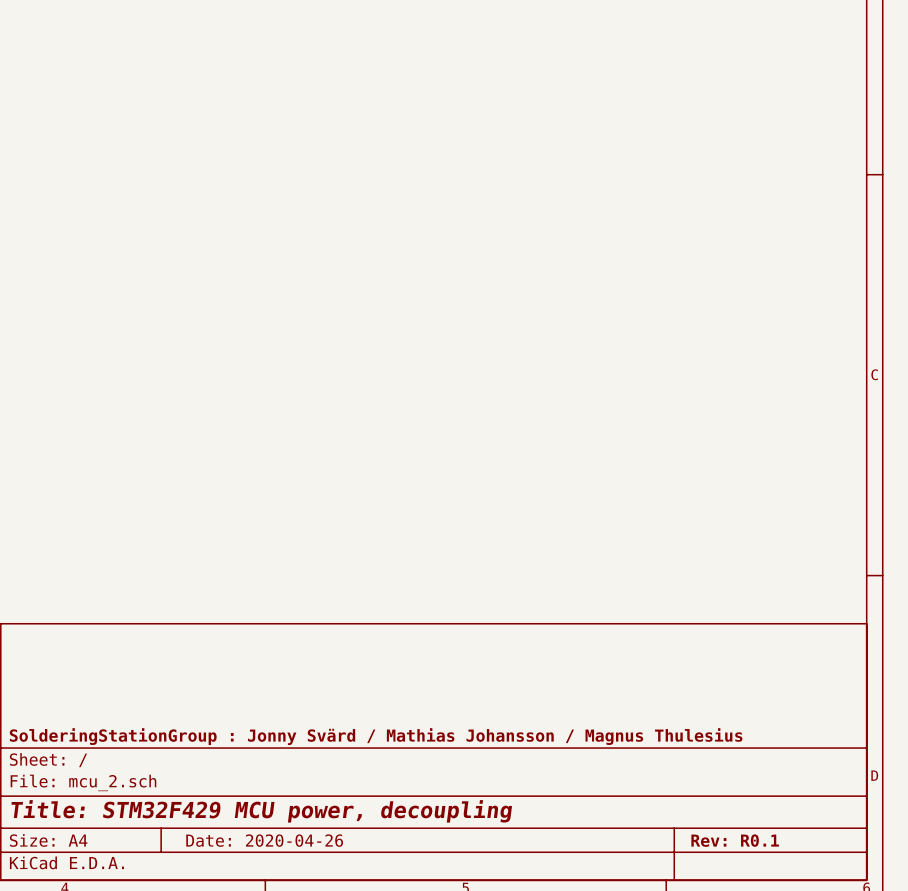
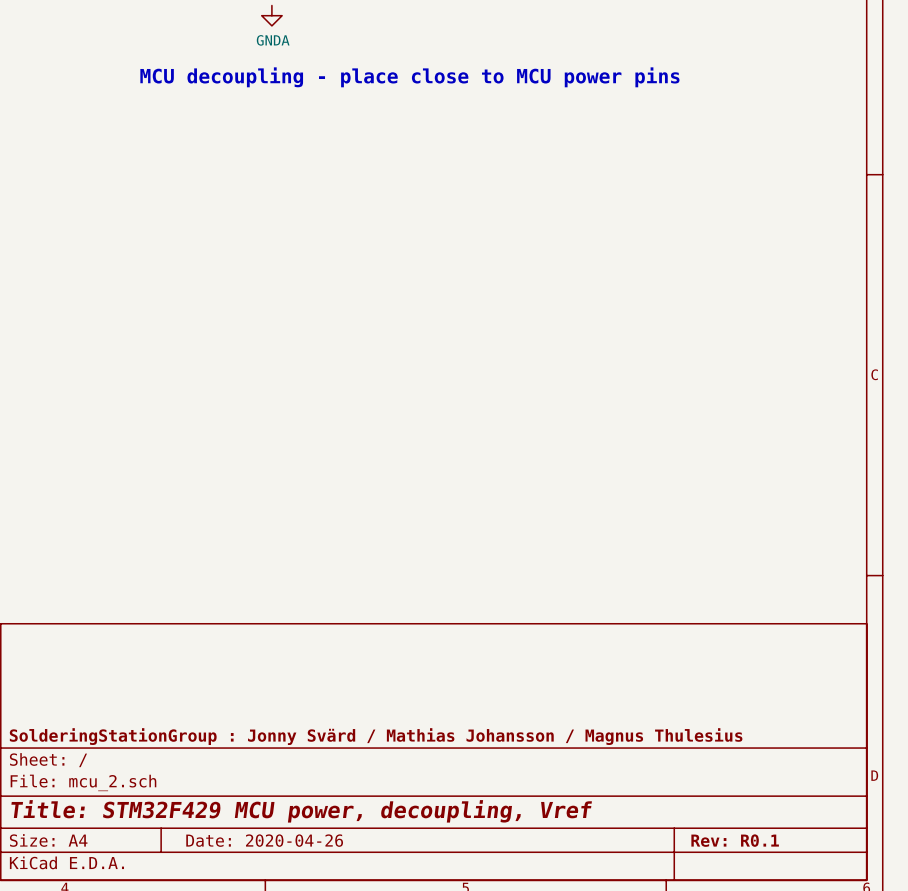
power symbol: none -> GNDA (271, 15)
text: none -> MCU decoupling - place close to MCU power pins (409, 77)
title block: Title: STM32F429 MCU power, decoupling (261, 811) -> Title: STM32F429 MCU power, decoupling, Vref (301, 811)

